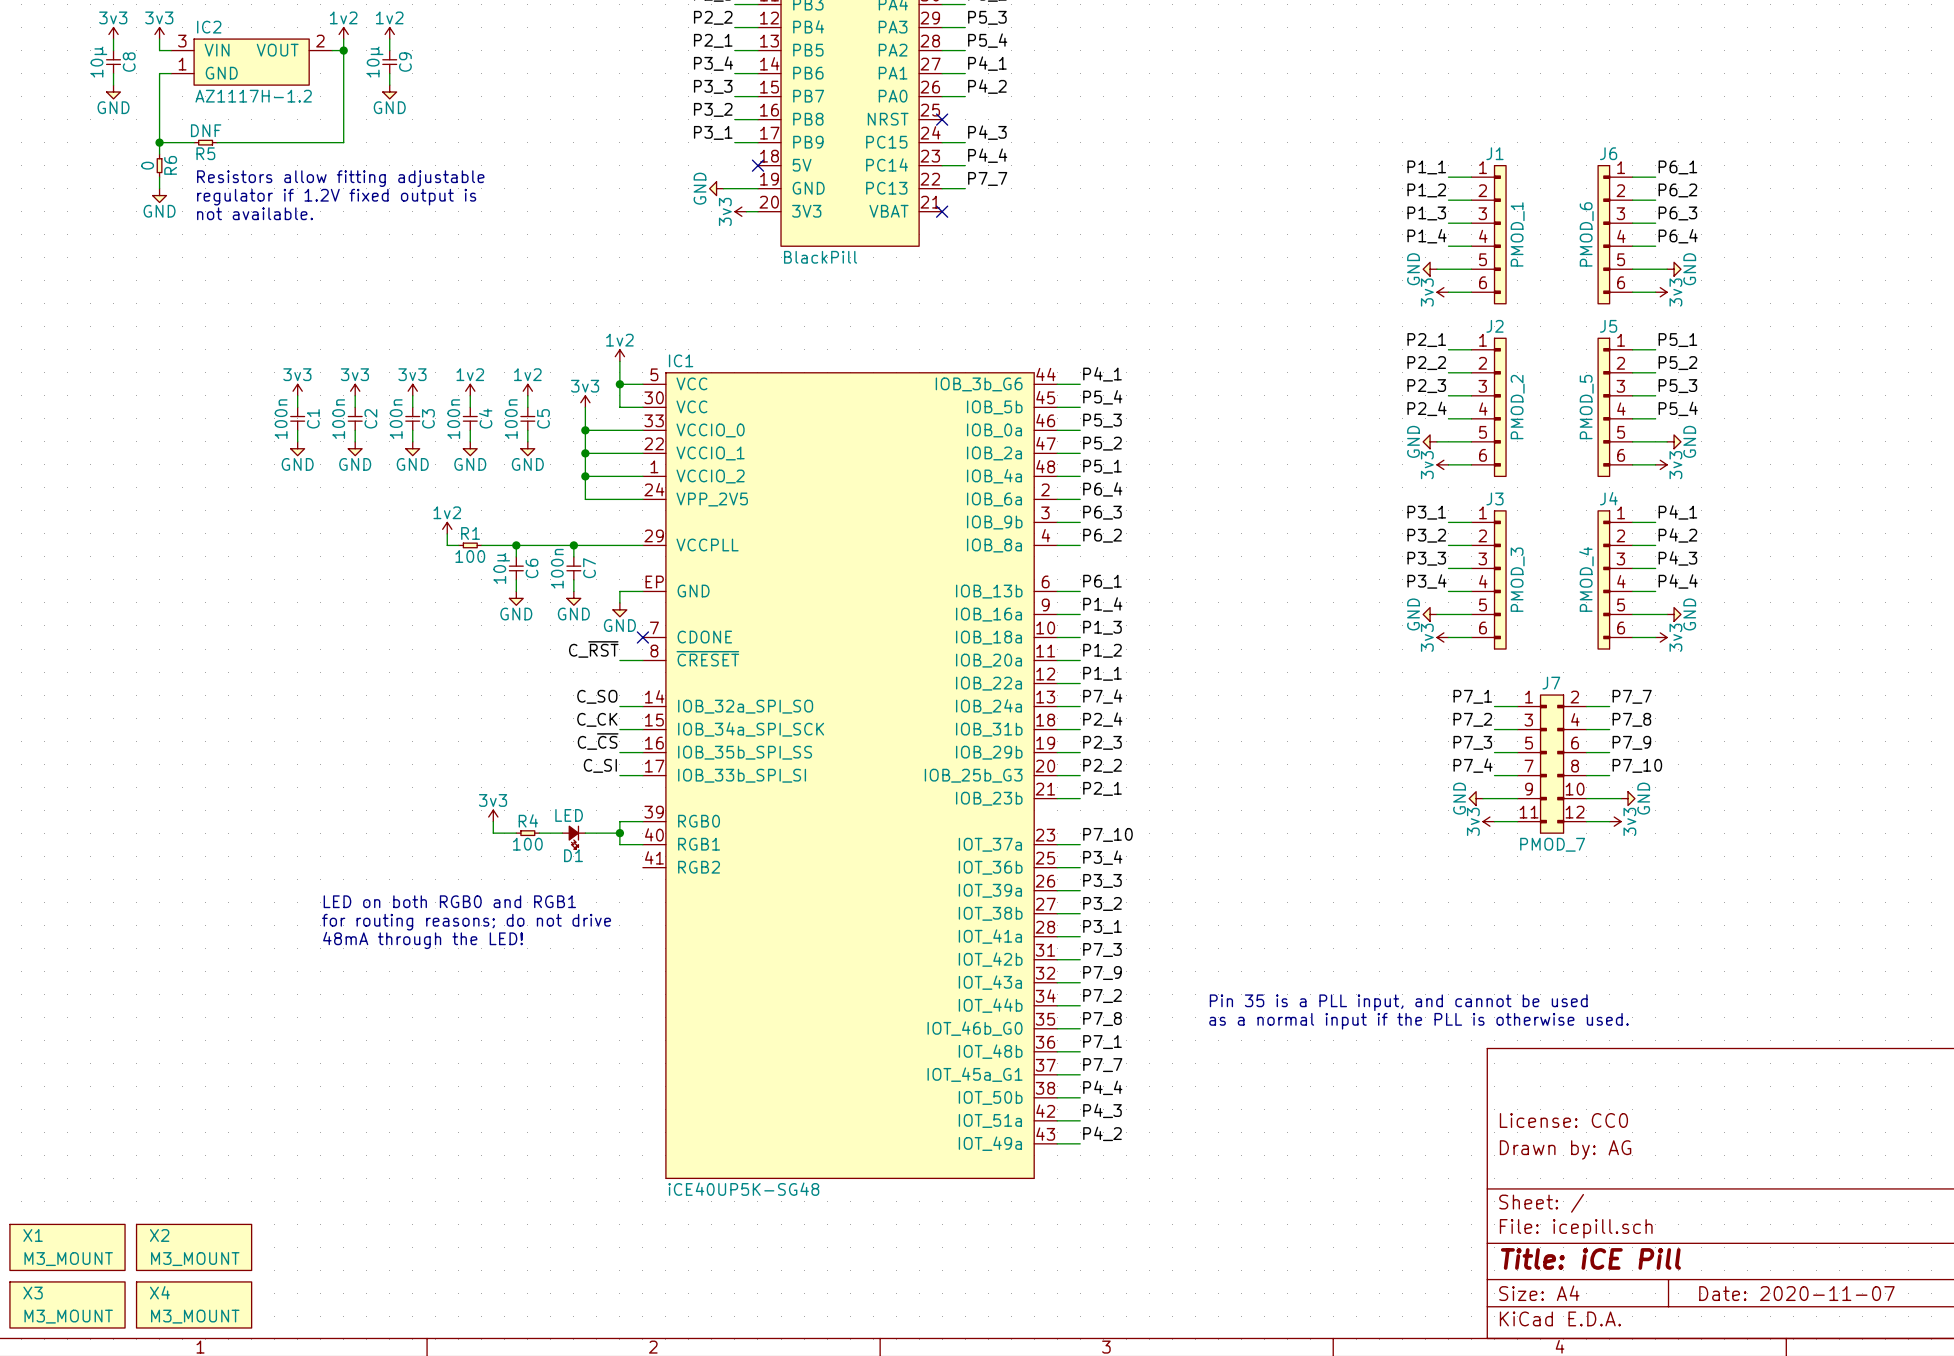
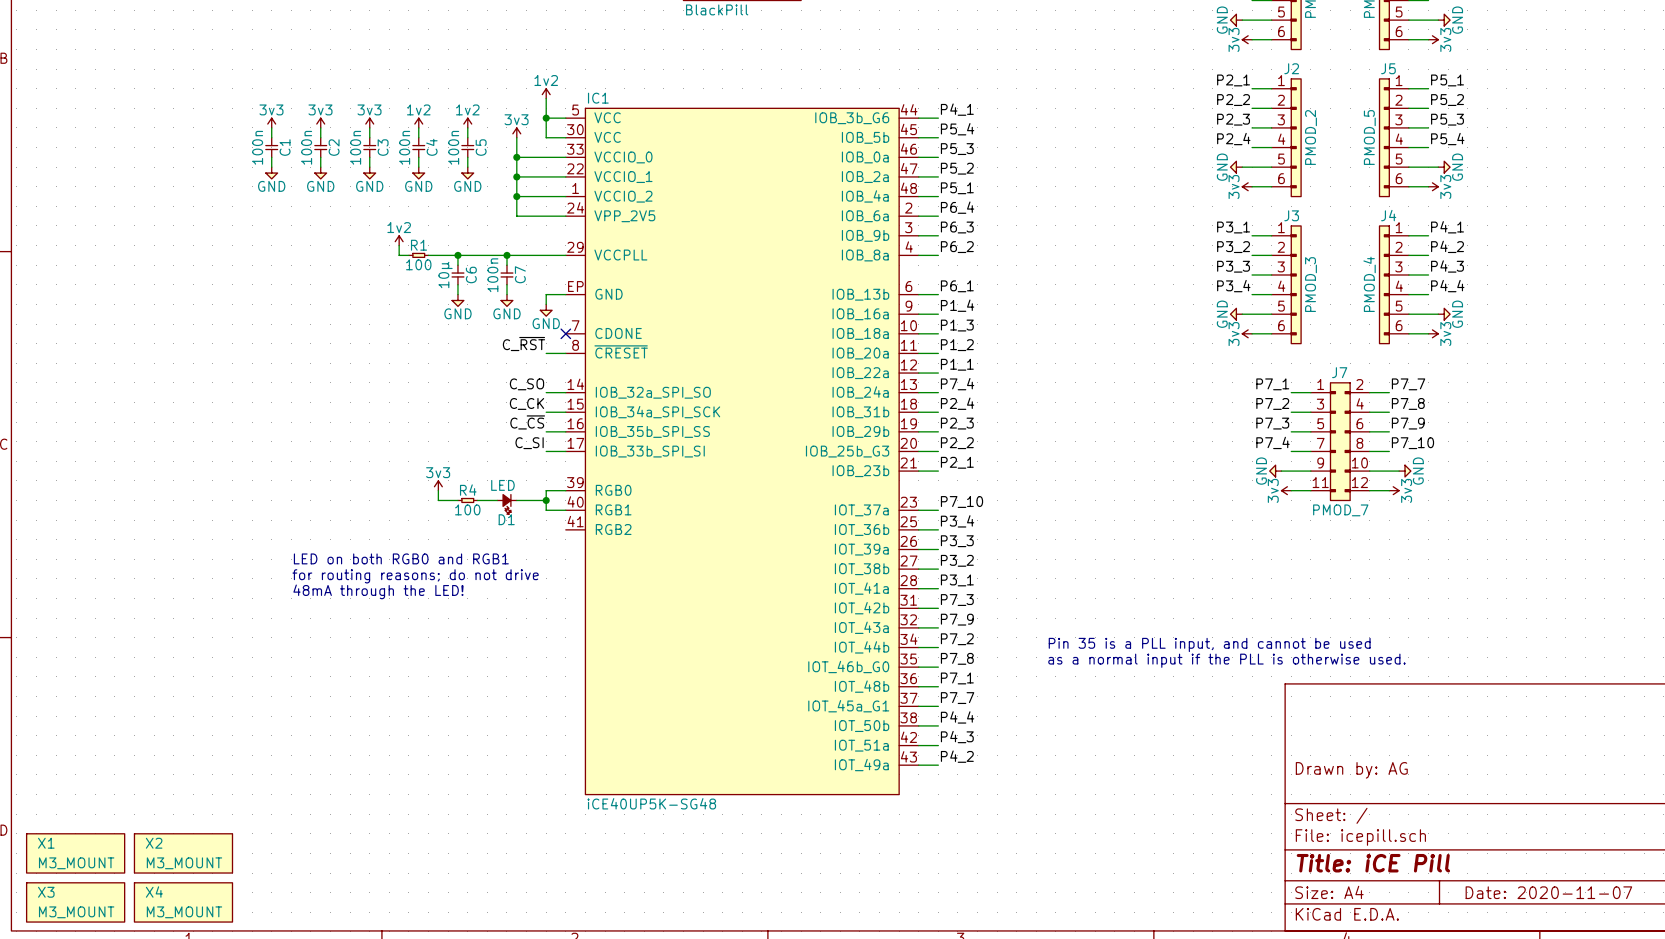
title block: License: CC0 (1563, 1120) -> none

